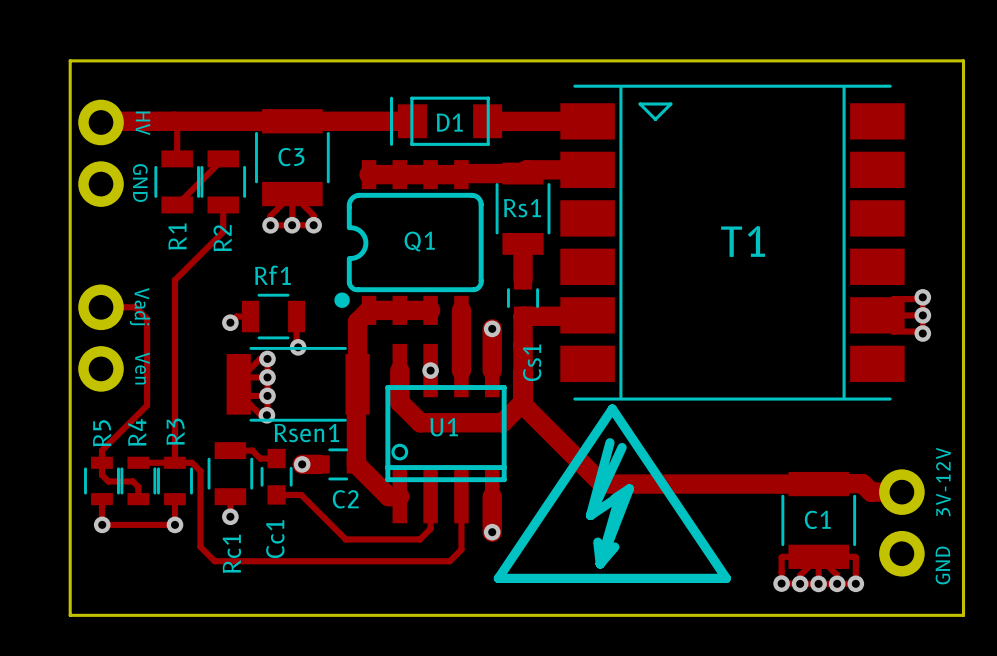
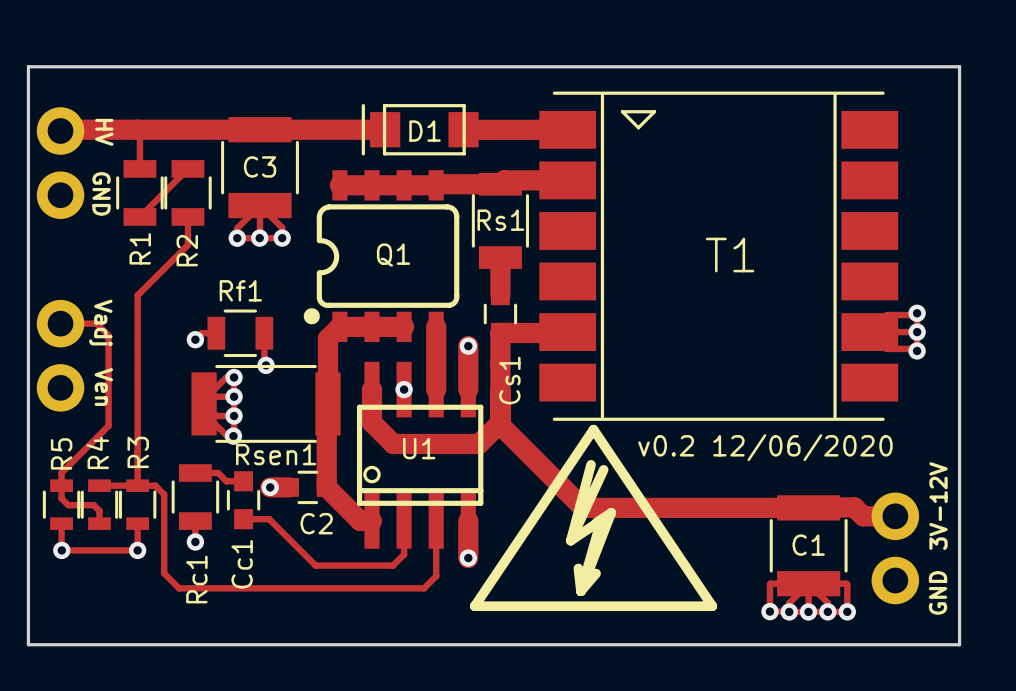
text: none -> v0.2 12/06/2020 (765, 447)

